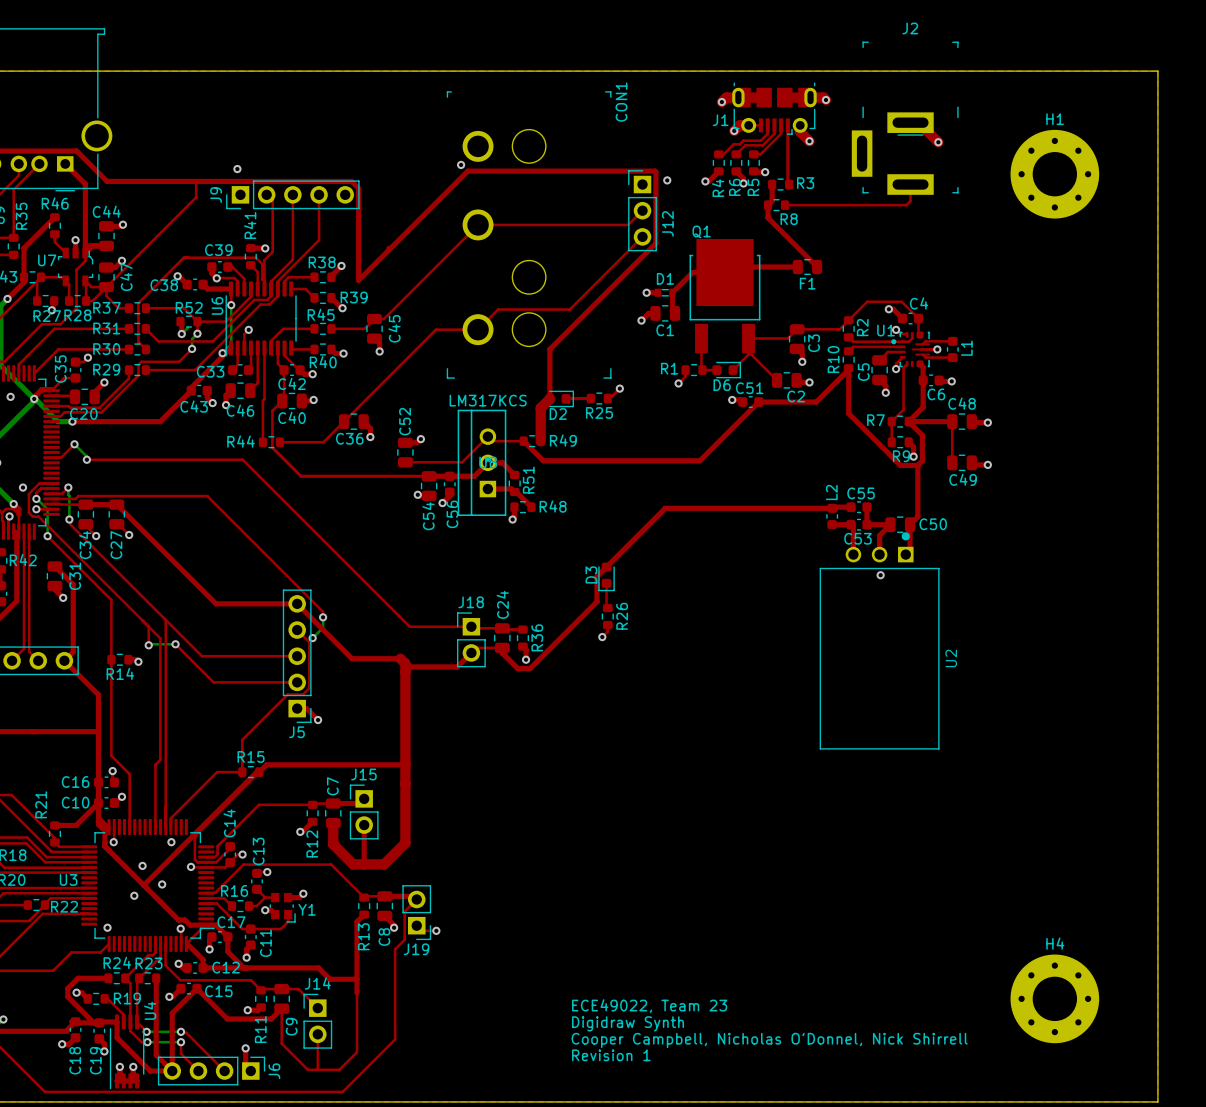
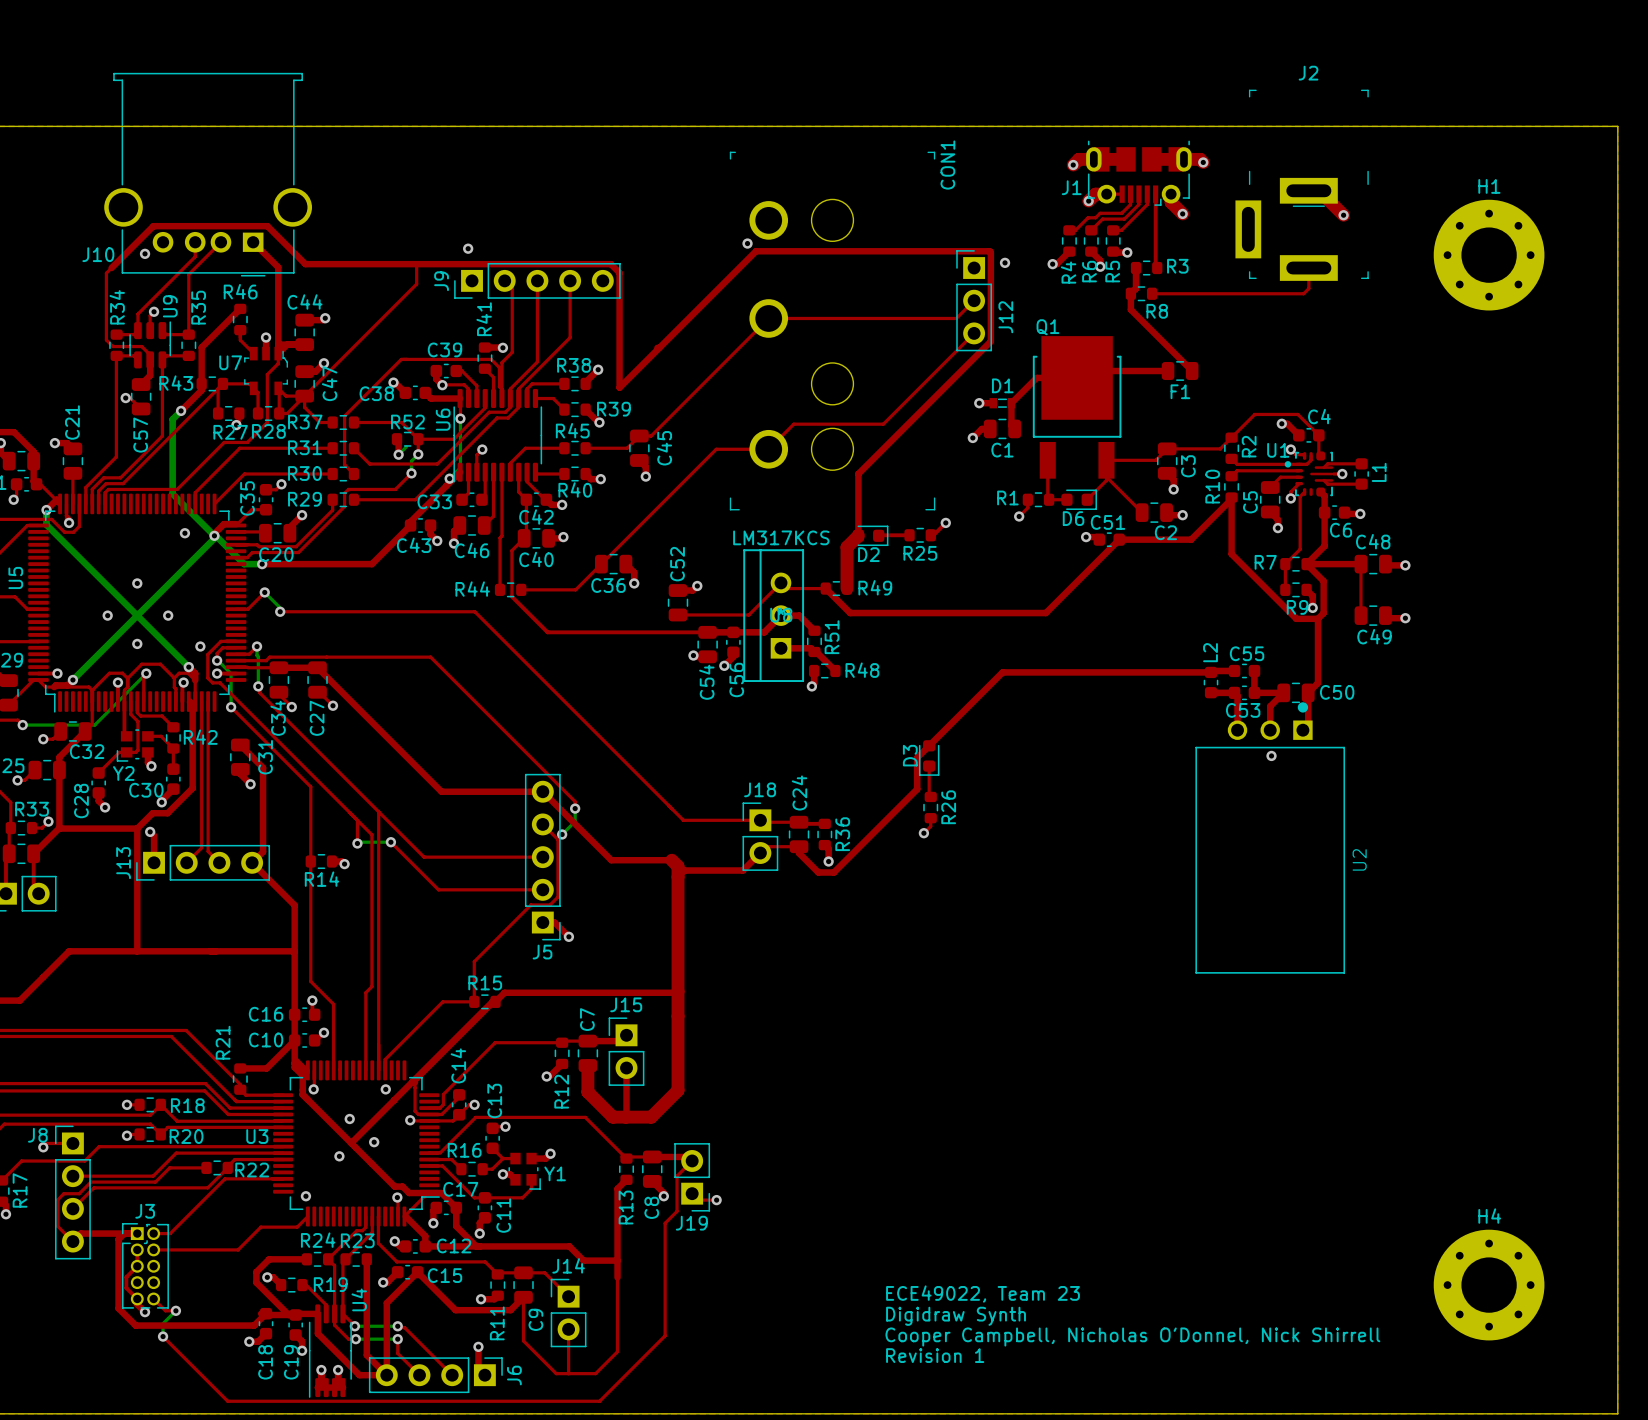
top track: (920, 349) (930, 349) -> none

